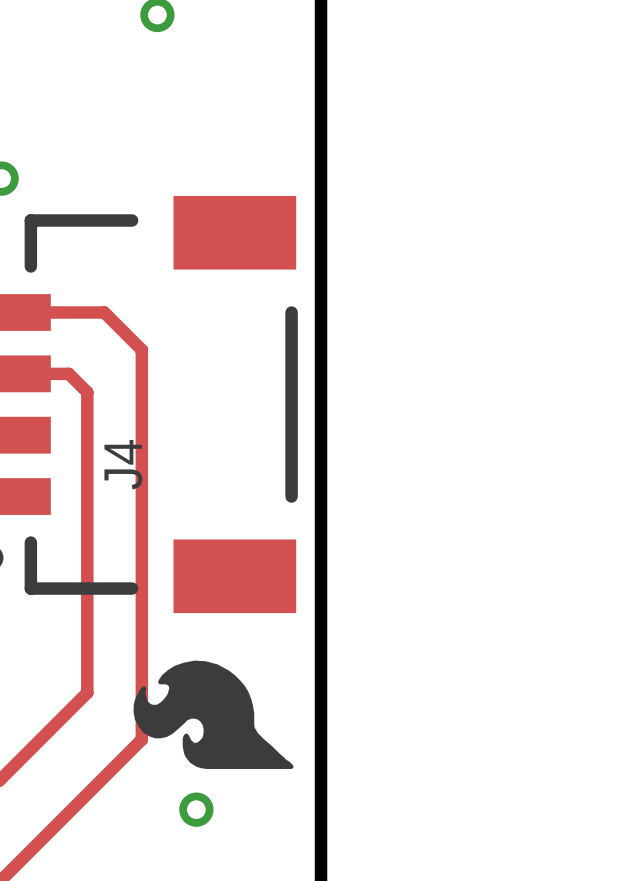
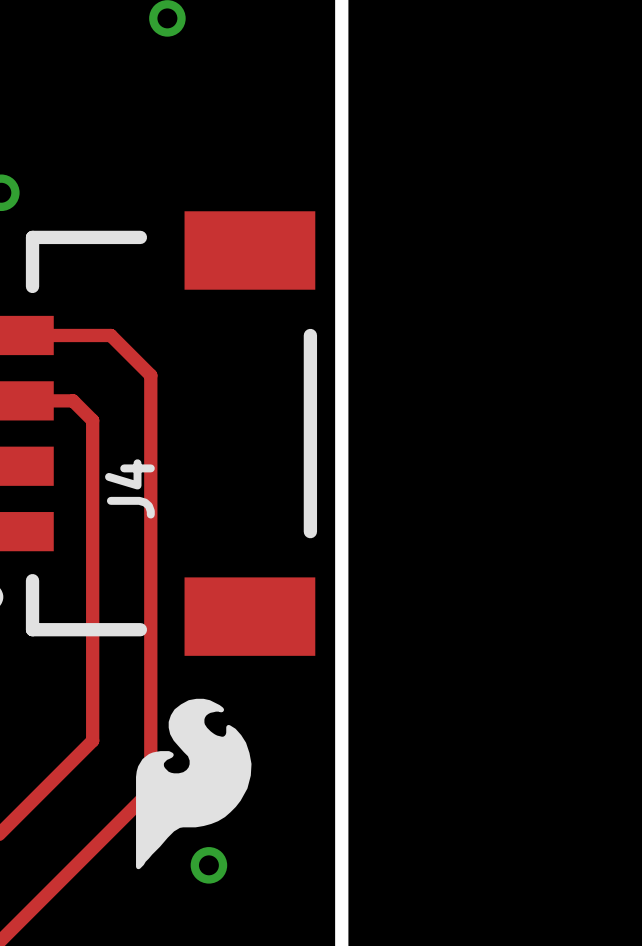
drawing shape: [133, 660, 294, 769] -> [136, 698, 252, 870]

